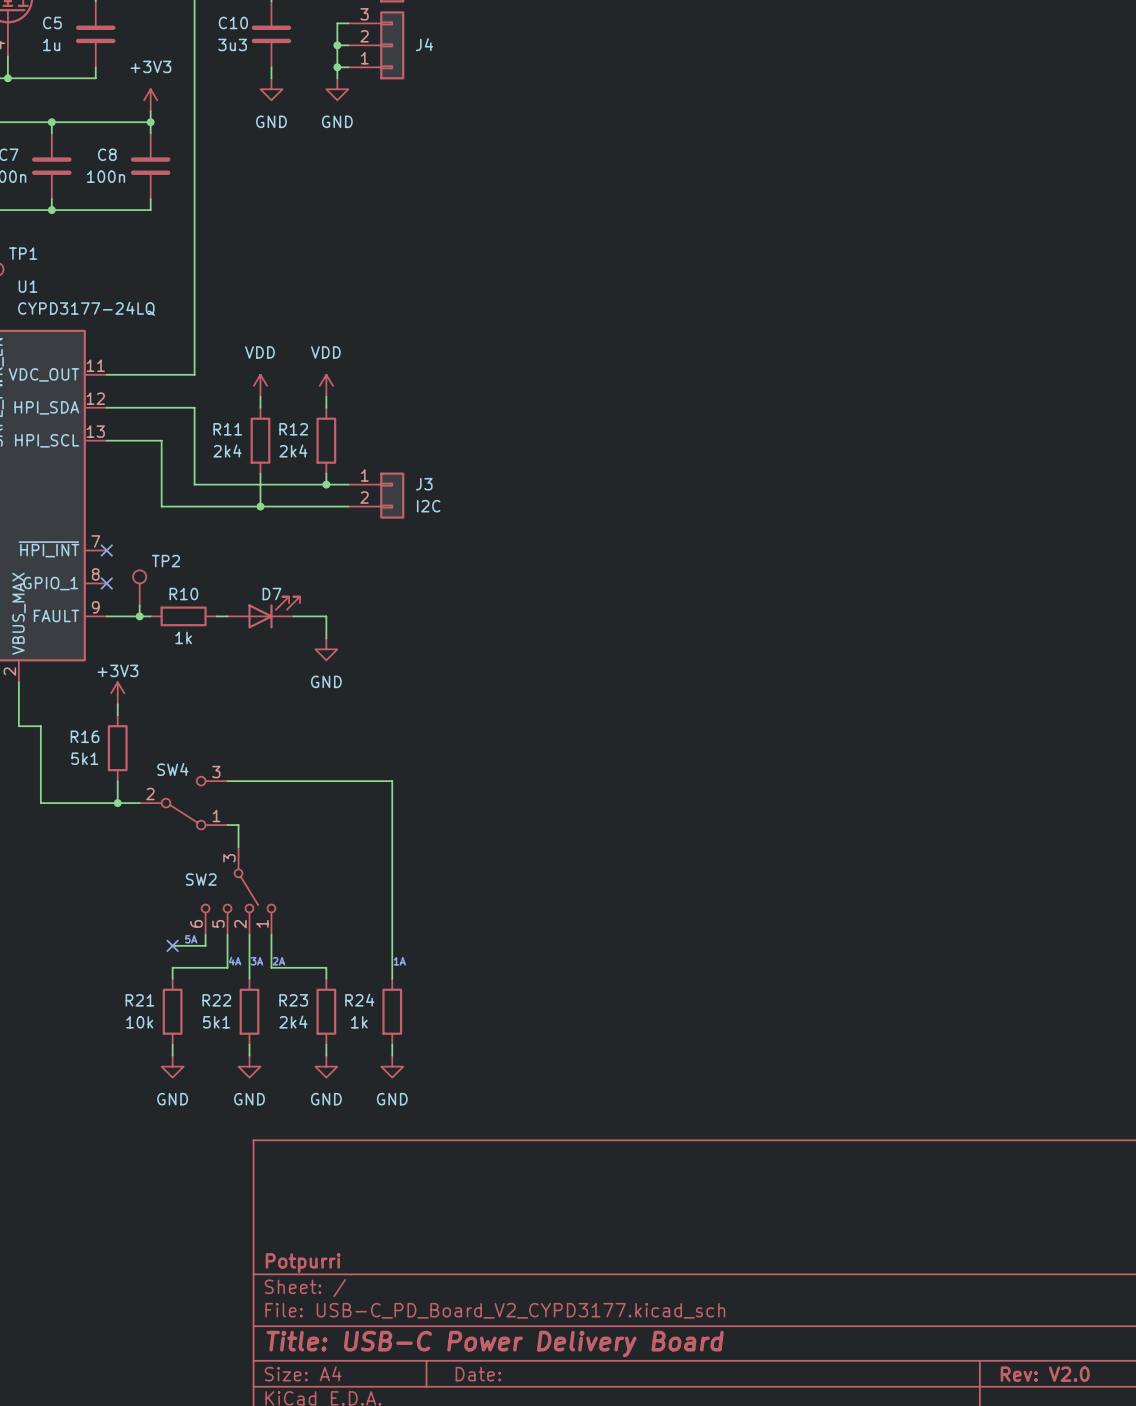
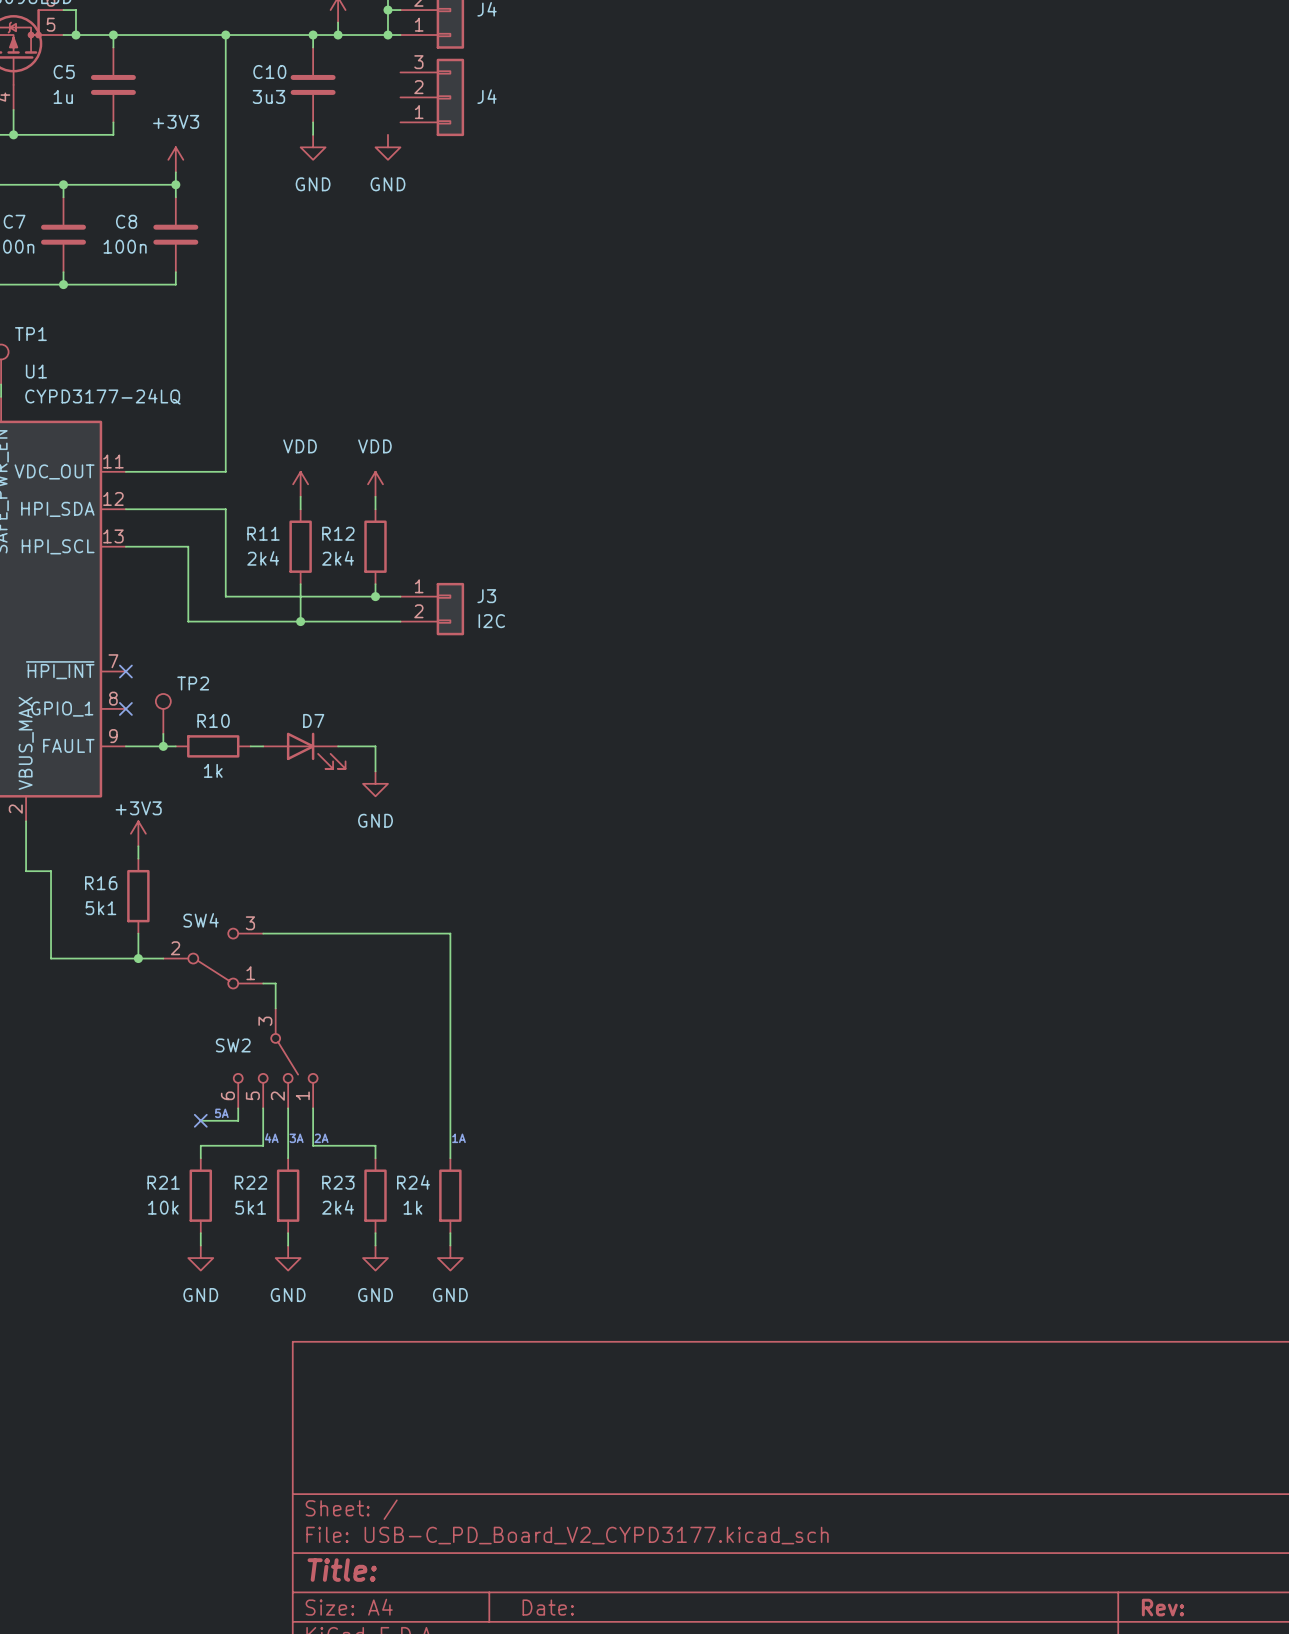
wire: (348, 23) (337, 23) (337, 78) -> none
wire: (337, 45) (348, 45) -> none
junction: (337, 45) -> none
wire: (337, 67) (348, 67) -> none
junction: (337, 67) -> none
D7 flip: as is (274, 612) -> up-down (316, 750)
title block: Potpurri (303, 1263) -> none
title block: Title: USB-C Power Delivery Board (495, 1344) -> Title: (342, 1570)
title block: Rev: V2.0 (1045, 1374) -> Rev: (1162, 1607)

